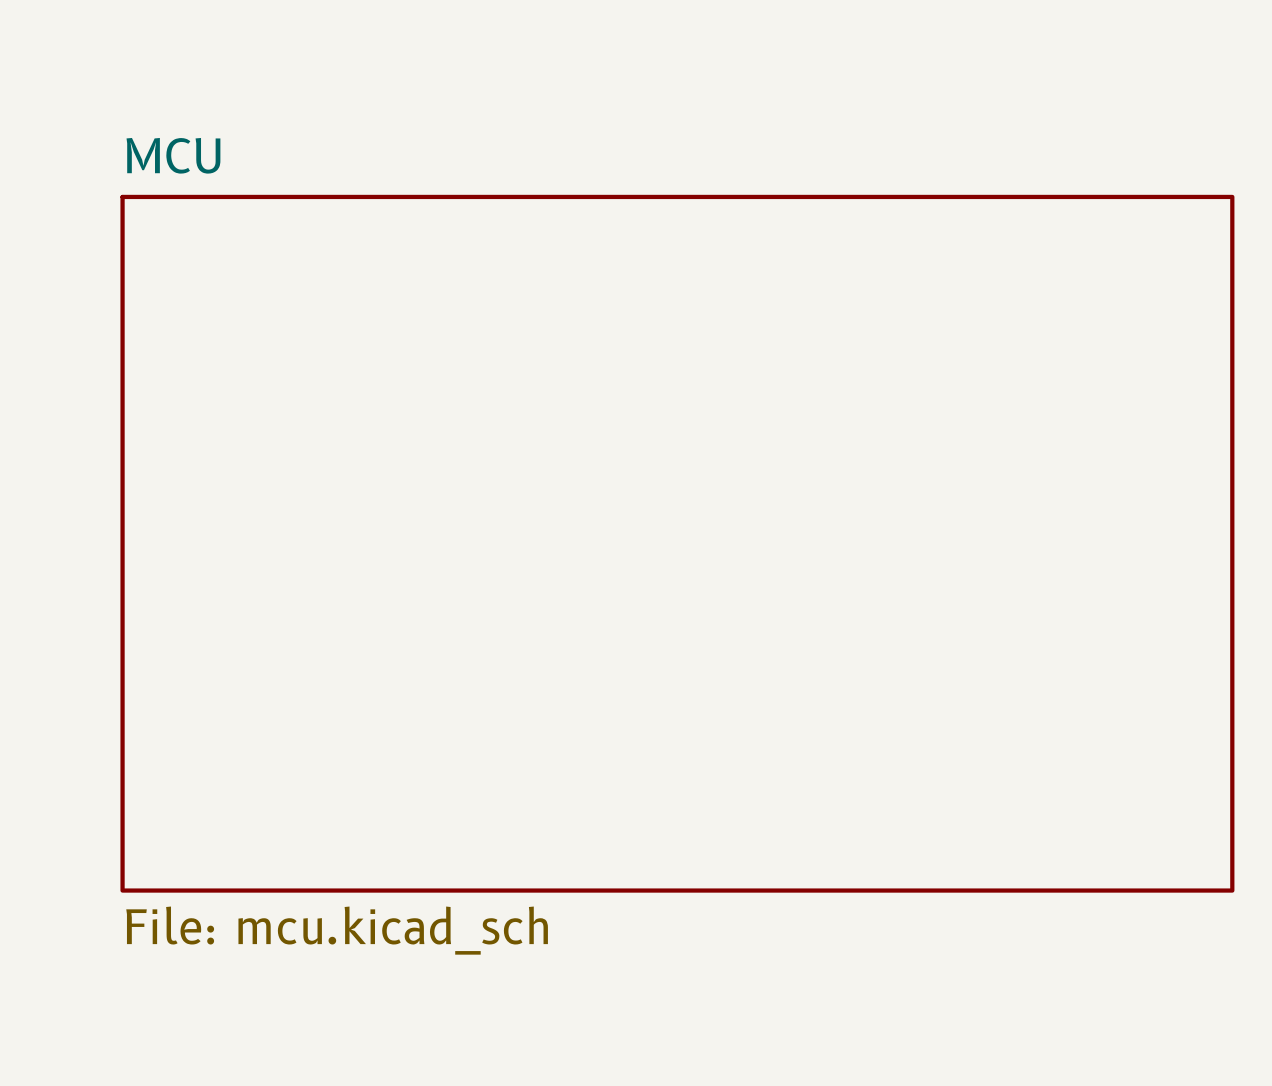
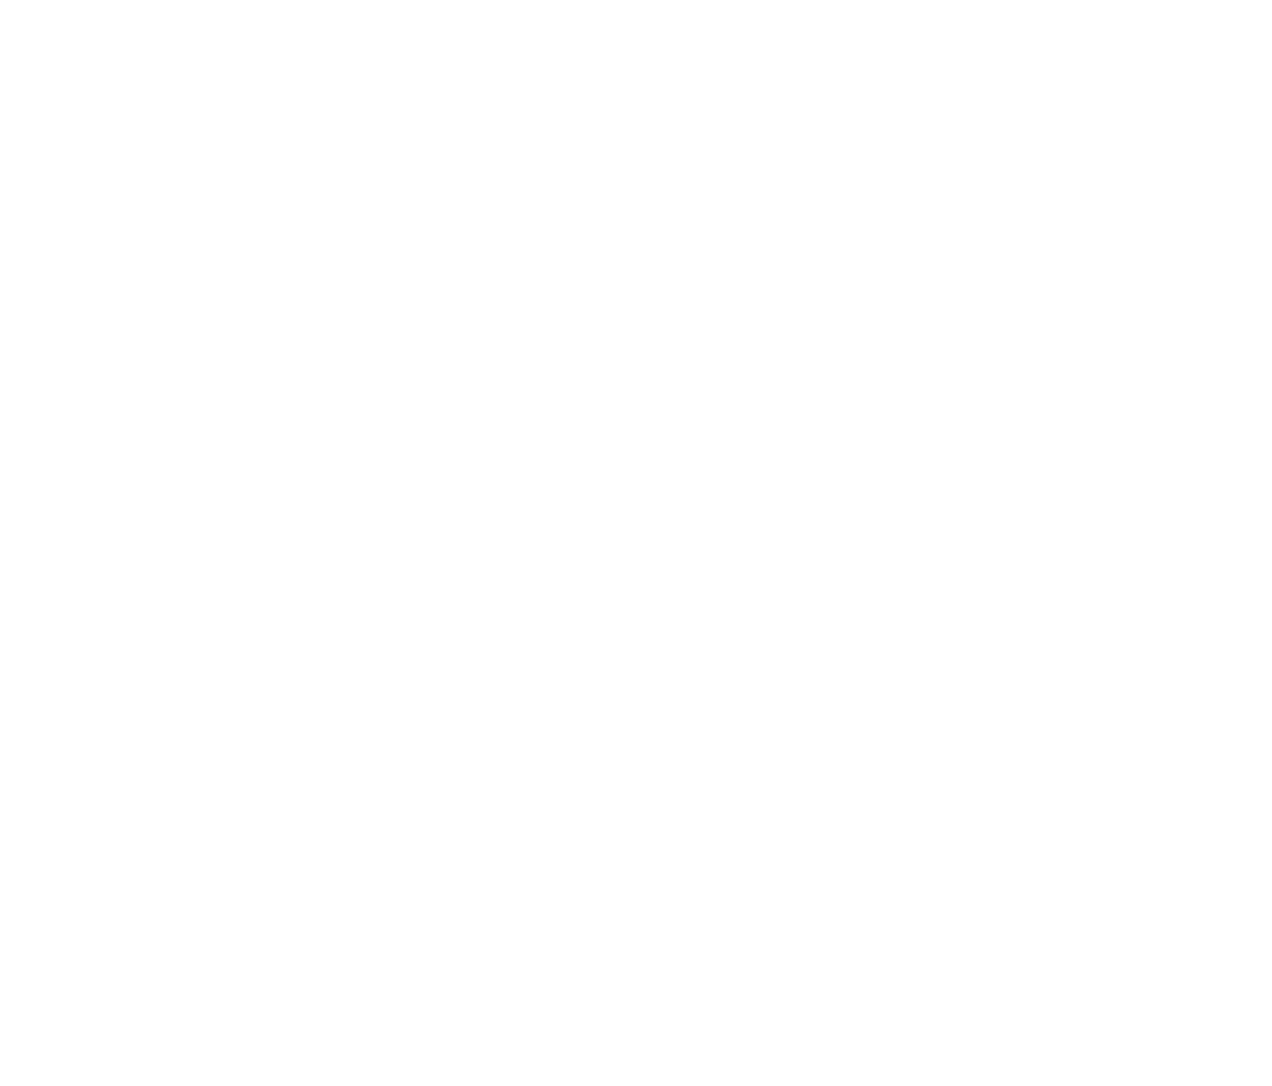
sheet MCU: File: mcu.kicad_sch (677, 543) -> none

